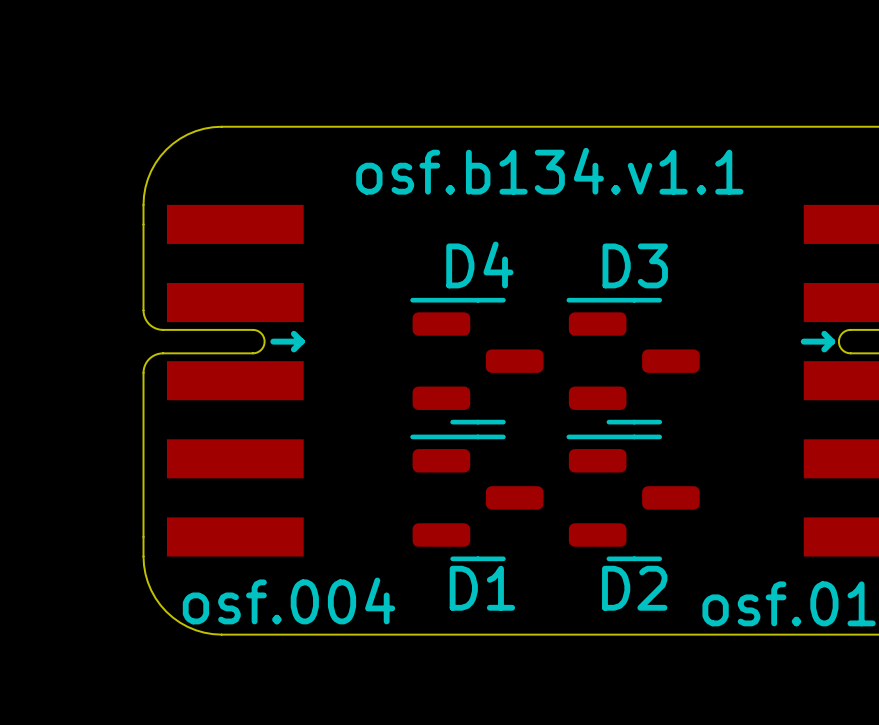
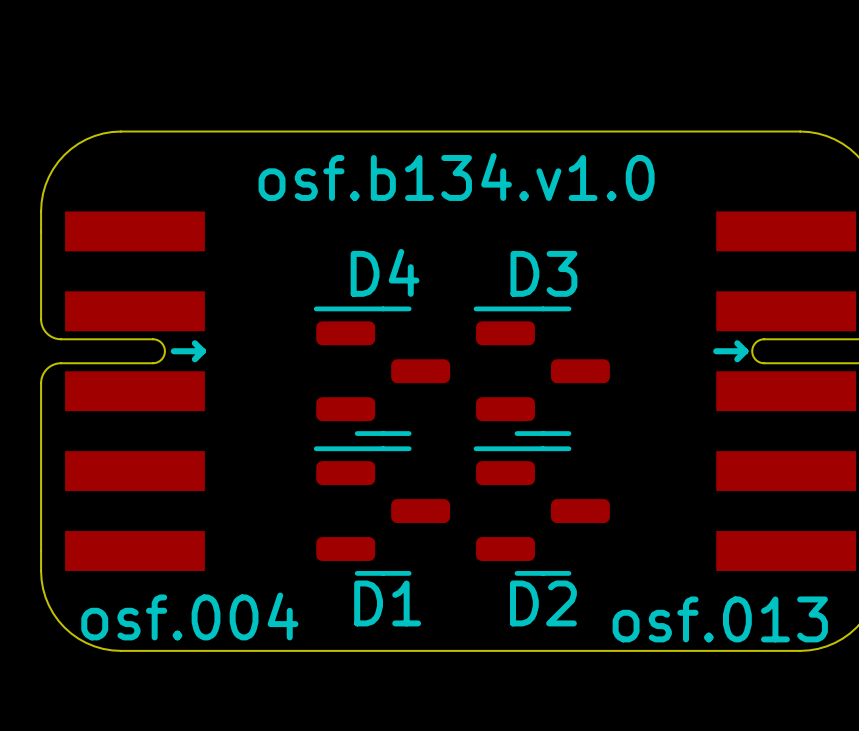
text: osf.b134.v1.1 (549, 171) -> osf.b134.v1.0 (456, 177)

